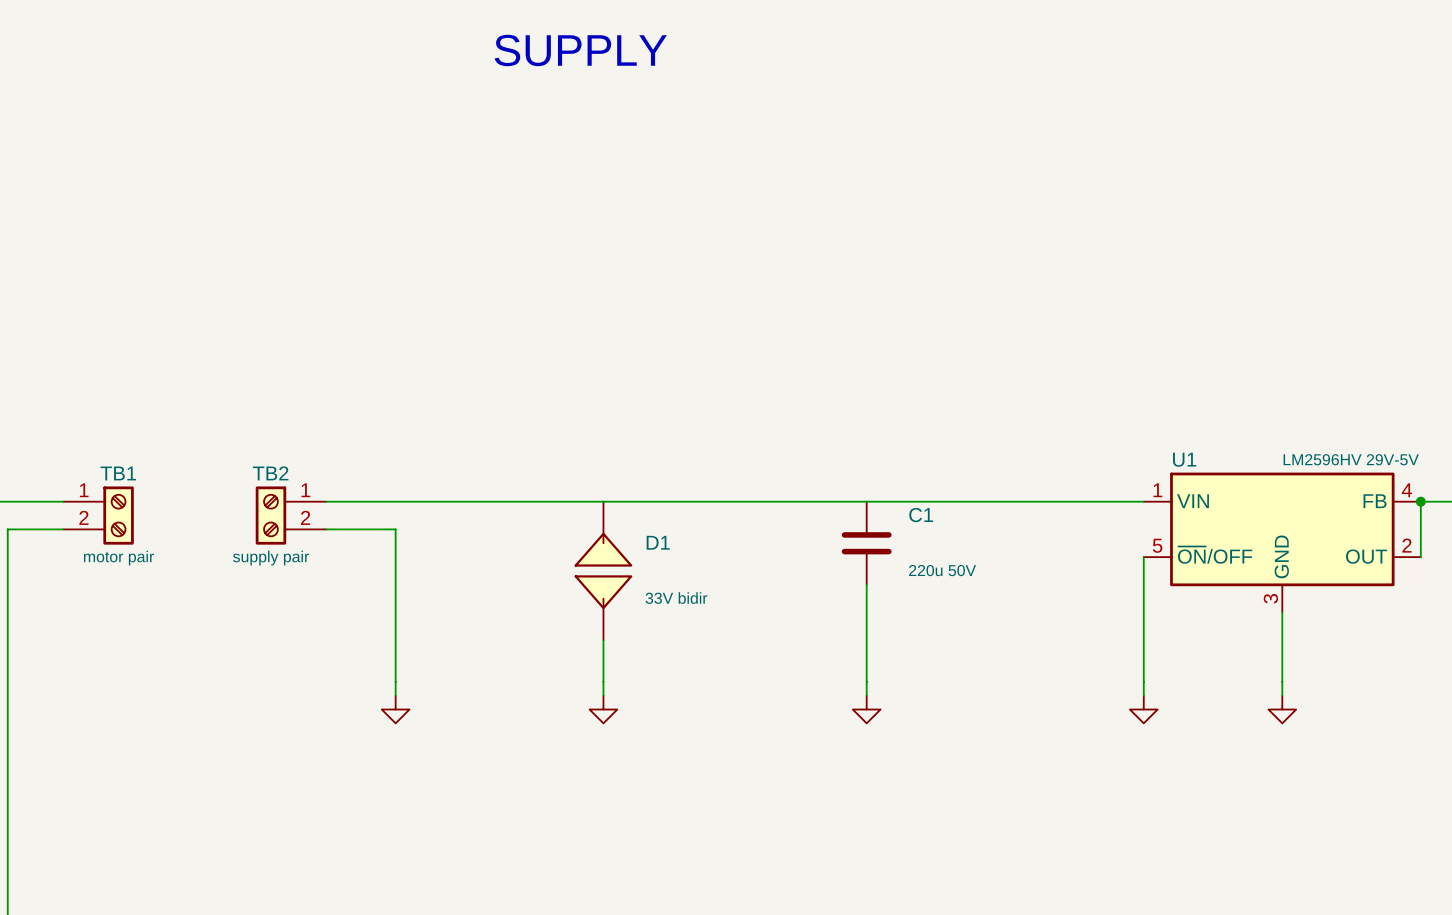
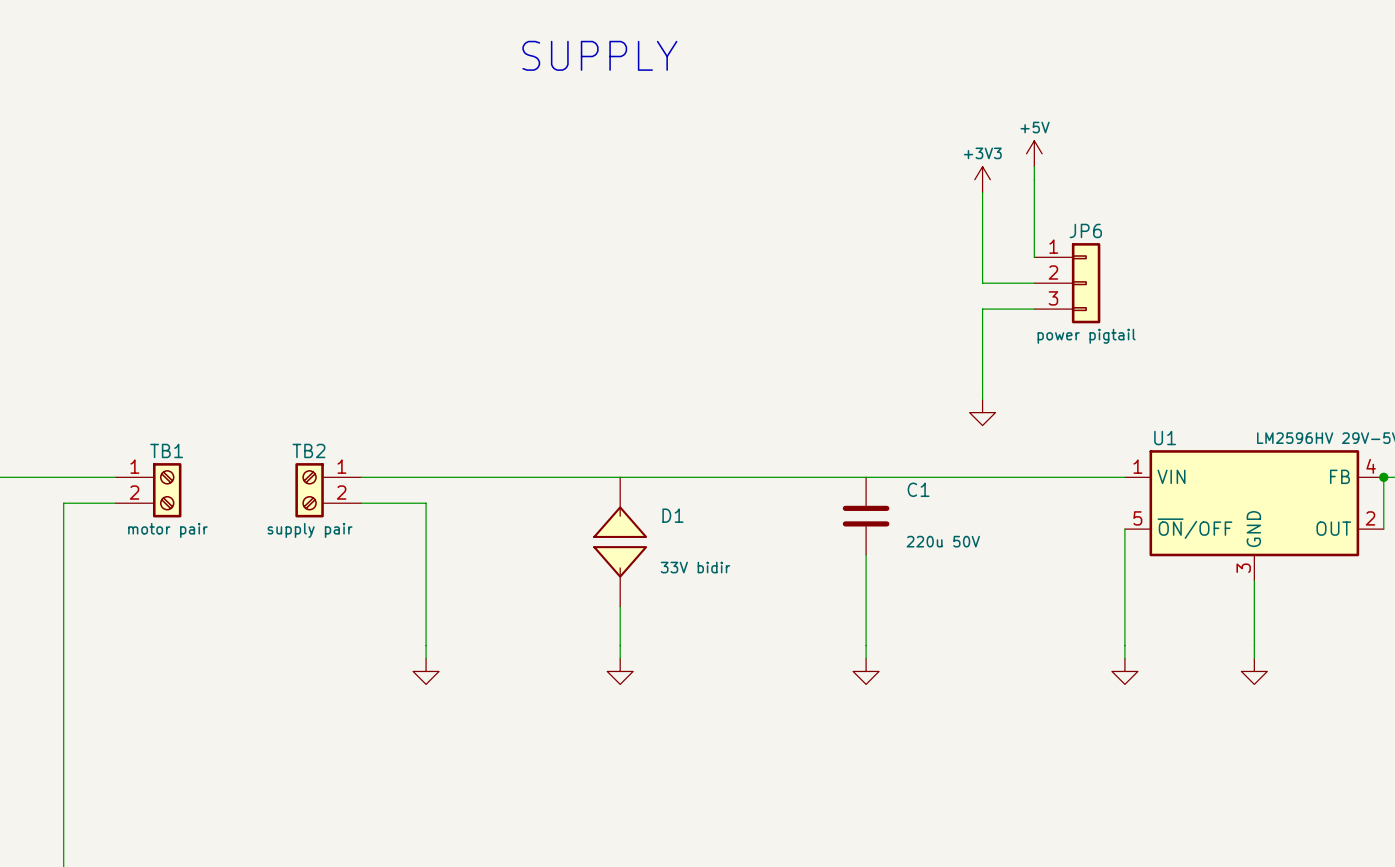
power symbol: none -> +5V (1034, 153)
wire: none -> (1034, 166) (1034, 257)
power symbol: none -> +3V3 (982, 179)
wire: none -> (982, 192) (982, 283) (1034, 283)
JP6: none -> power pigtail (1067, 283)
wire: none -> (1034, 309) (982, 309) (982, 399)
power symbol: none -> (982, 412)

